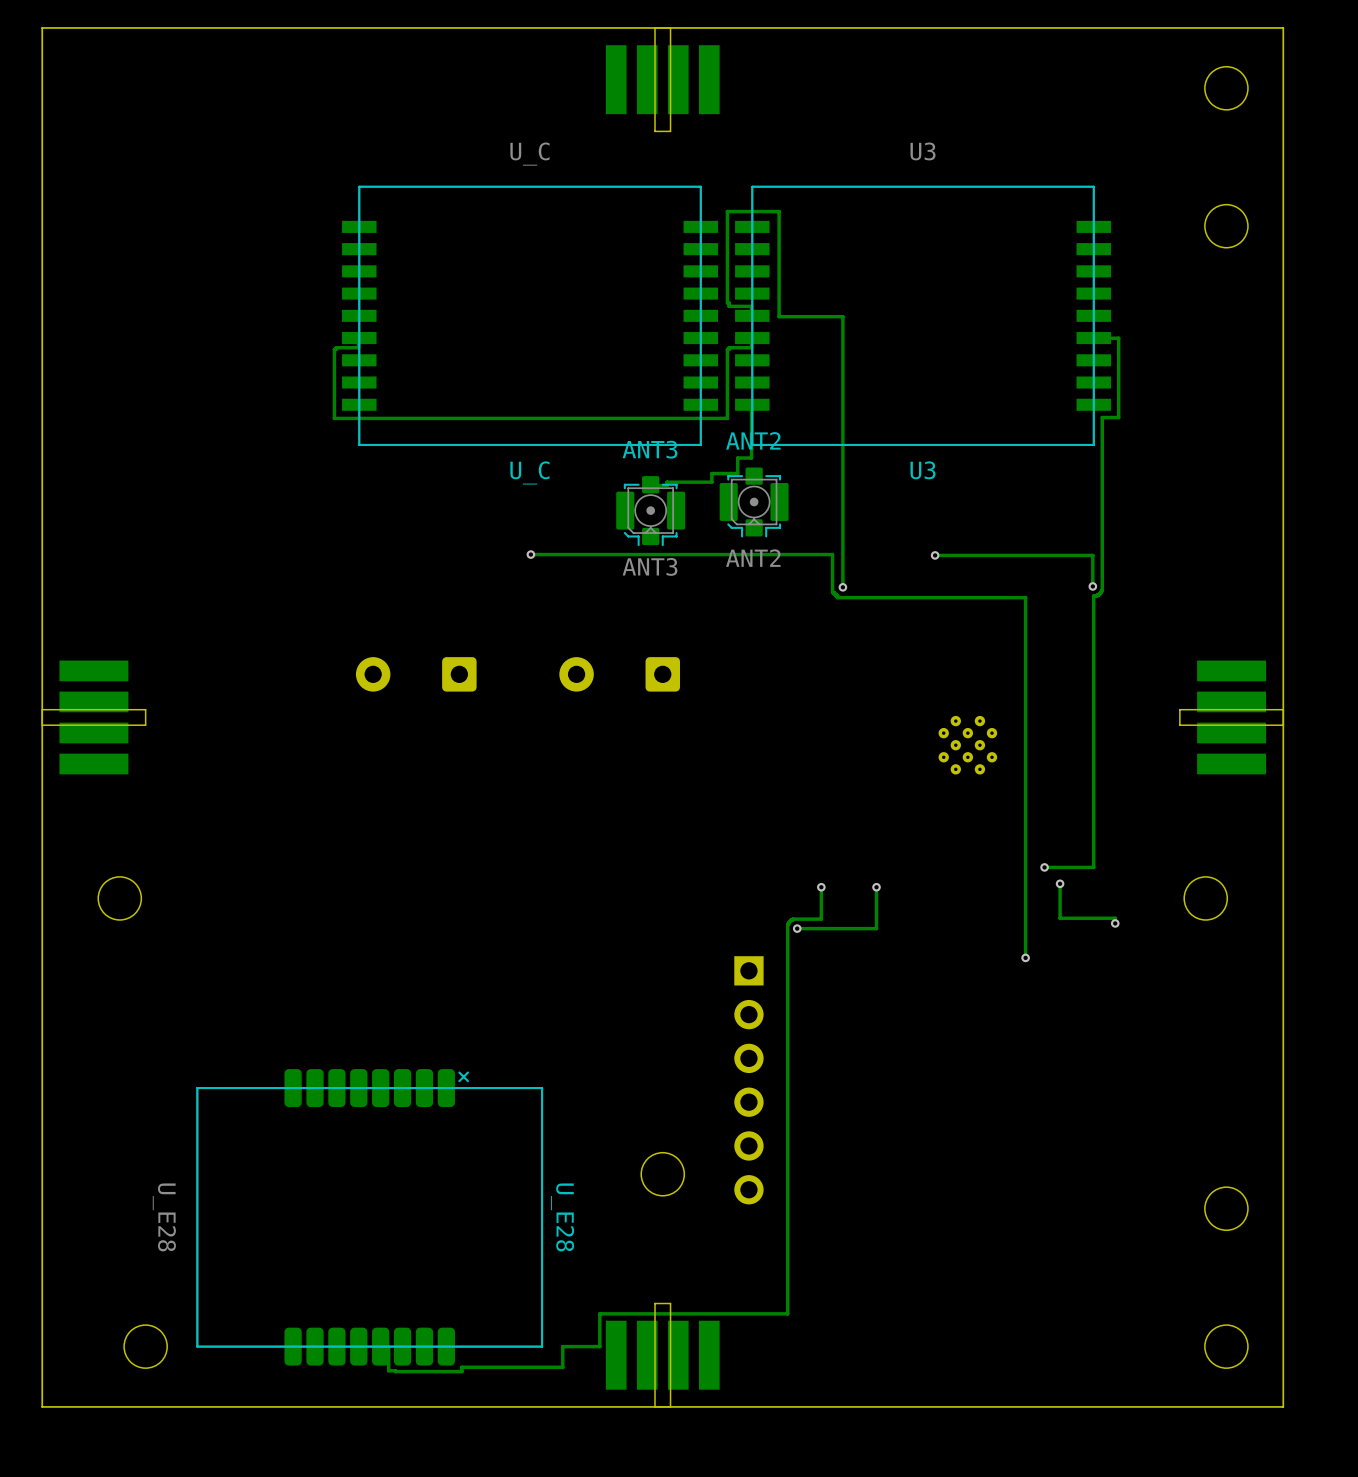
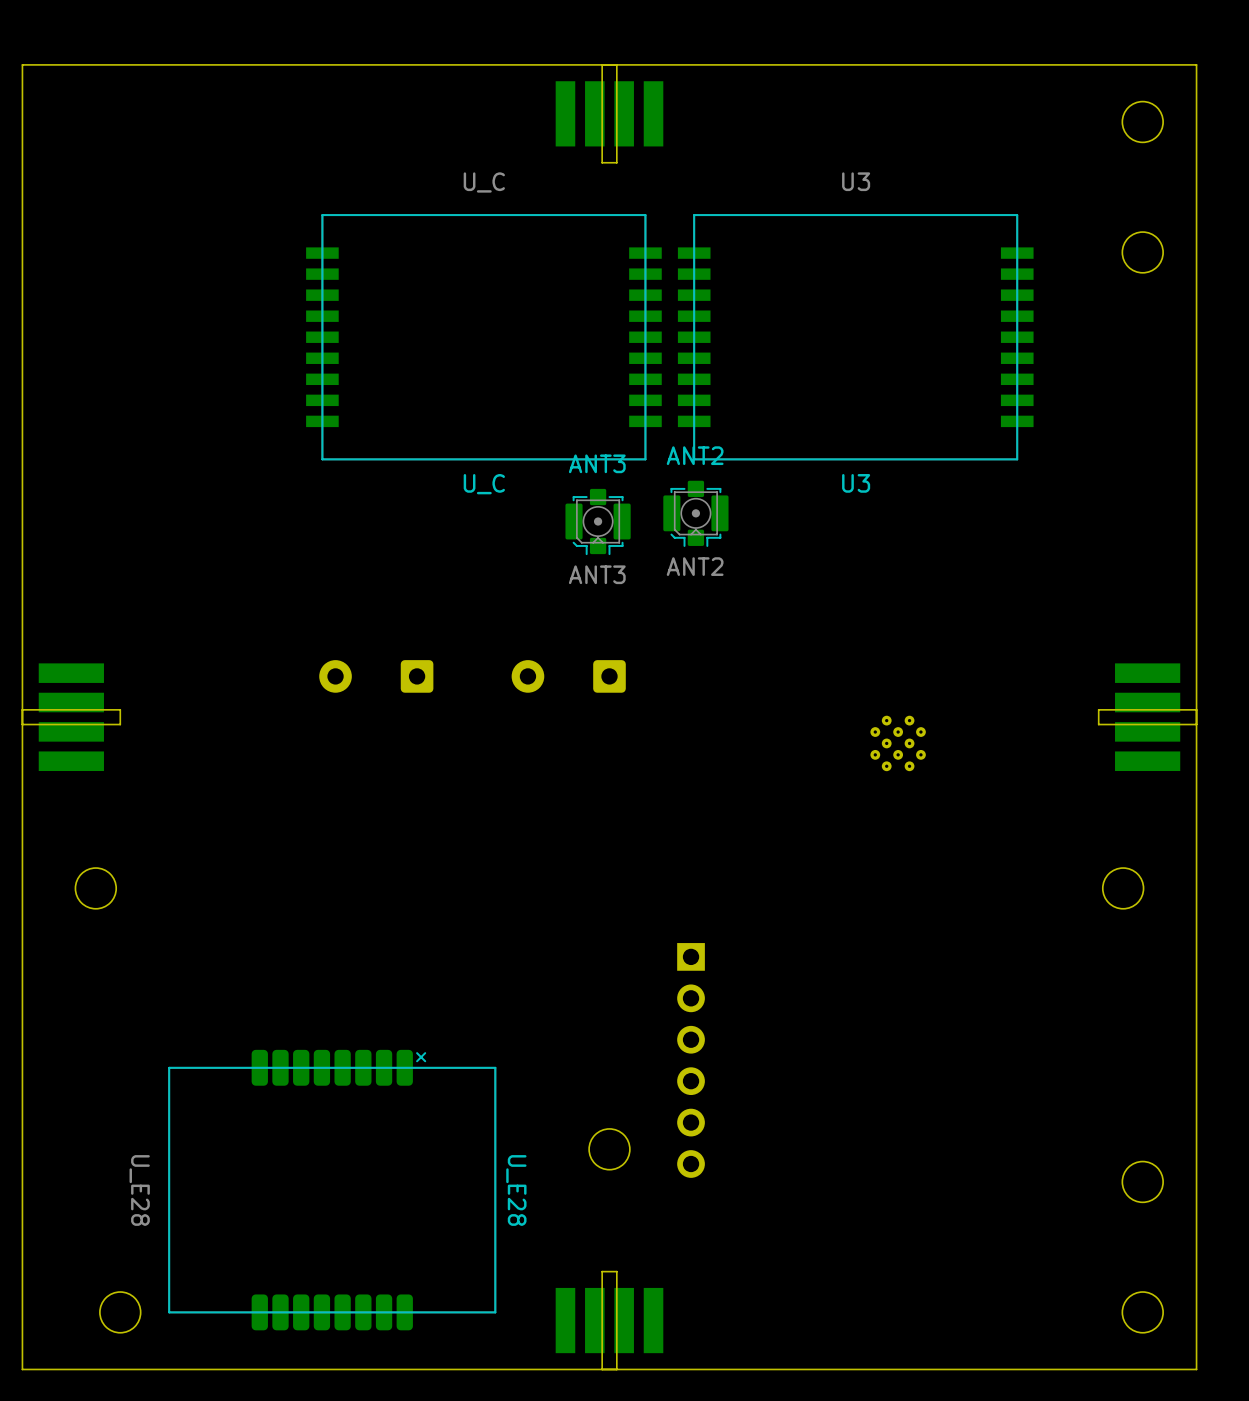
track: (751, 316) (751, 306) (729, 306) (729, 302) (727, 302) (727, 211) (779, 211) (779, 316) (842, 316) (842, 587) -> none
track: (751, 337) (751, 347) (729, 347) (727, 349) (727, 418) (334, 418) (334, 349) (336, 347) (358, 347) (358, 337) -> none
track: (1093, 338) (1118, 338) (1118, 417) (1102, 417) (1102, 590) (1098, 595) (1093, 595) (1093, 867) (1044, 867) -> none
track: (751, 404) (751, 458) (737, 458) (737, 473) (711, 473) (711, 482) (667, 482) (667, 485) (649, 485) -> none
track: (530, 554) (832, 554) (832, 592) (837, 597) (1025, 597) (1025, 957) -> none
via: (530, 554) -> none
track: (935, 555) (1092, 555) (1092, 586) -> none
via: (935, 555) -> none
via: (1092, 586) -> none
via: (842, 587) -> none
via: (1044, 867) -> none
track: (1060, 883) (1060, 918) (1115, 918) (1115, 923) -> none
via: (1060, 883) -> none
track: (821, 887) (821, 919) (792, 919) (787, 924) (787, 1313) (599, 1313) (599, 1346) (562, 1346) (562, 1367) (461, 1367) (461, 1371) (395, 1371) (388, 1370) (388, 1346) (380, 1346) -> none
via: (821, 887) -> none
track: (876, 887) (876, 928) (797, 928) -> none
via: (876, 887) -> none
via: (1115, 923) -> none
via: (797, 928) -> none
via: (1025, 957) -> none

